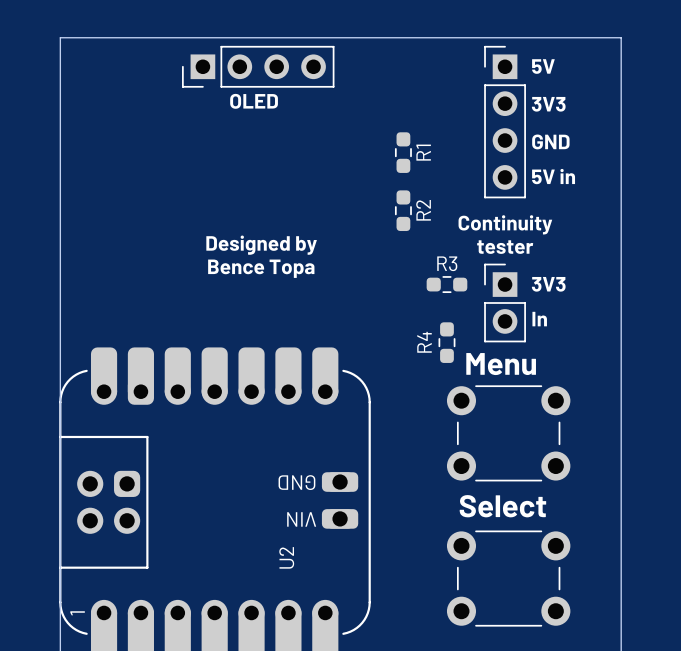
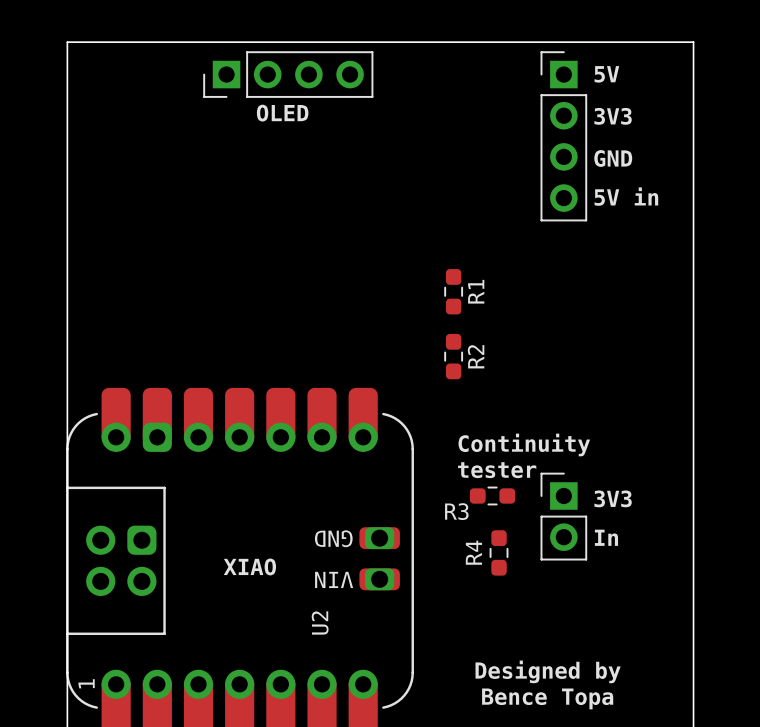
R1 position: (403, 152) -> (453, 291)
R2 position: (403, 210) -> (453, 356)
text position: Continuity (505, 224) -> Continuity (524, 444)
text: Designed by (261, 245) -> none
text position: tester (505, 247) -> tester (497, 470)
R3 name position: R3 (447, 263) -> R3 (456, 511)
text: Bence Topa (261, 268) -> none
R3 position: (446, 284) -> (492, 495)
text position: 3V3 (548, 284) -> 3V3 (613, 498)
part position: (505, 302) -> (563, 516)
text position: In (539, 319) -> In (606, 537)
R4 position: (446, 342) -> (499, 552)
text: Menu (501, 364) -> none
part: (508, 433) -> none
text: Select (502, 506) -> none
text: none -> XIAO (249, 566)
part: (508, 578) -> none
text: none -> Designed by (548, 671)
text: none -> Bence Topa (547, 698)

